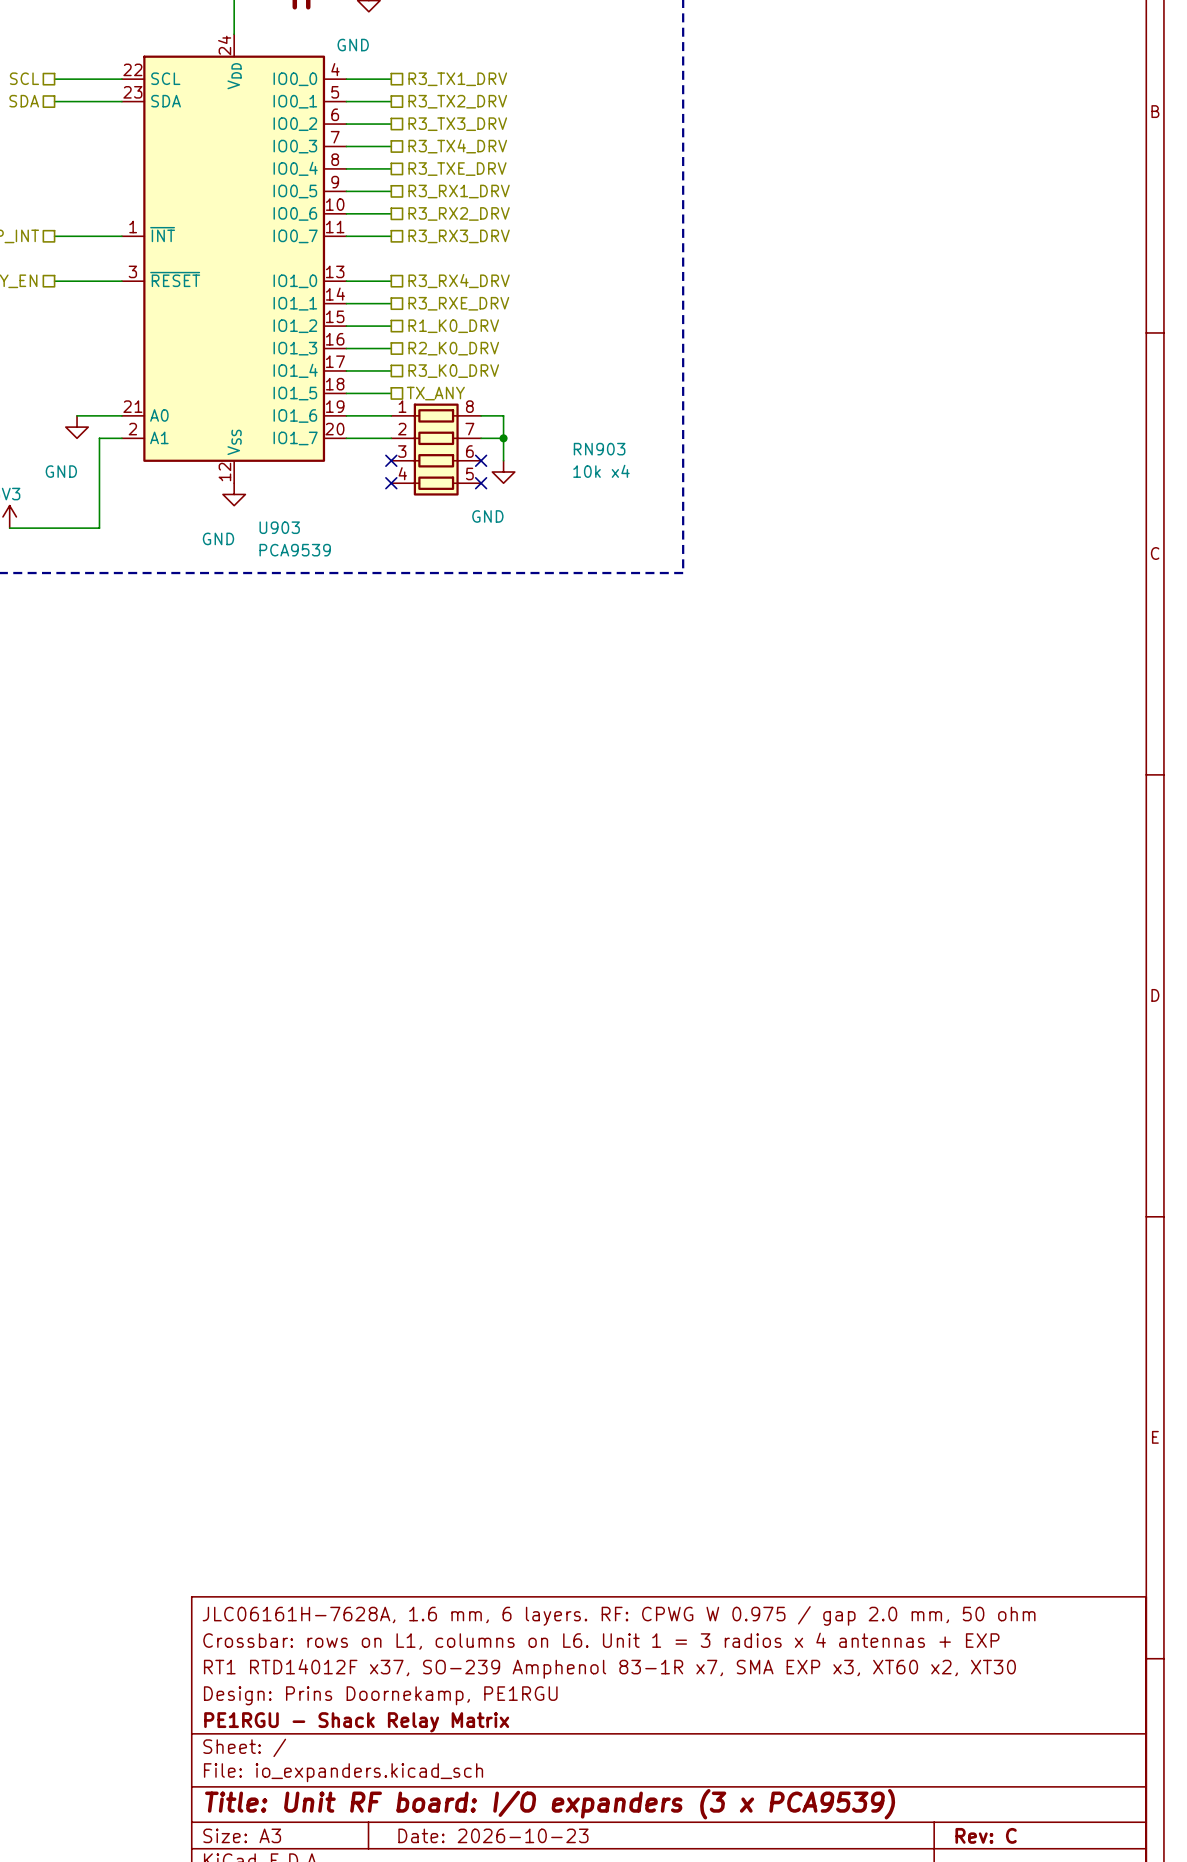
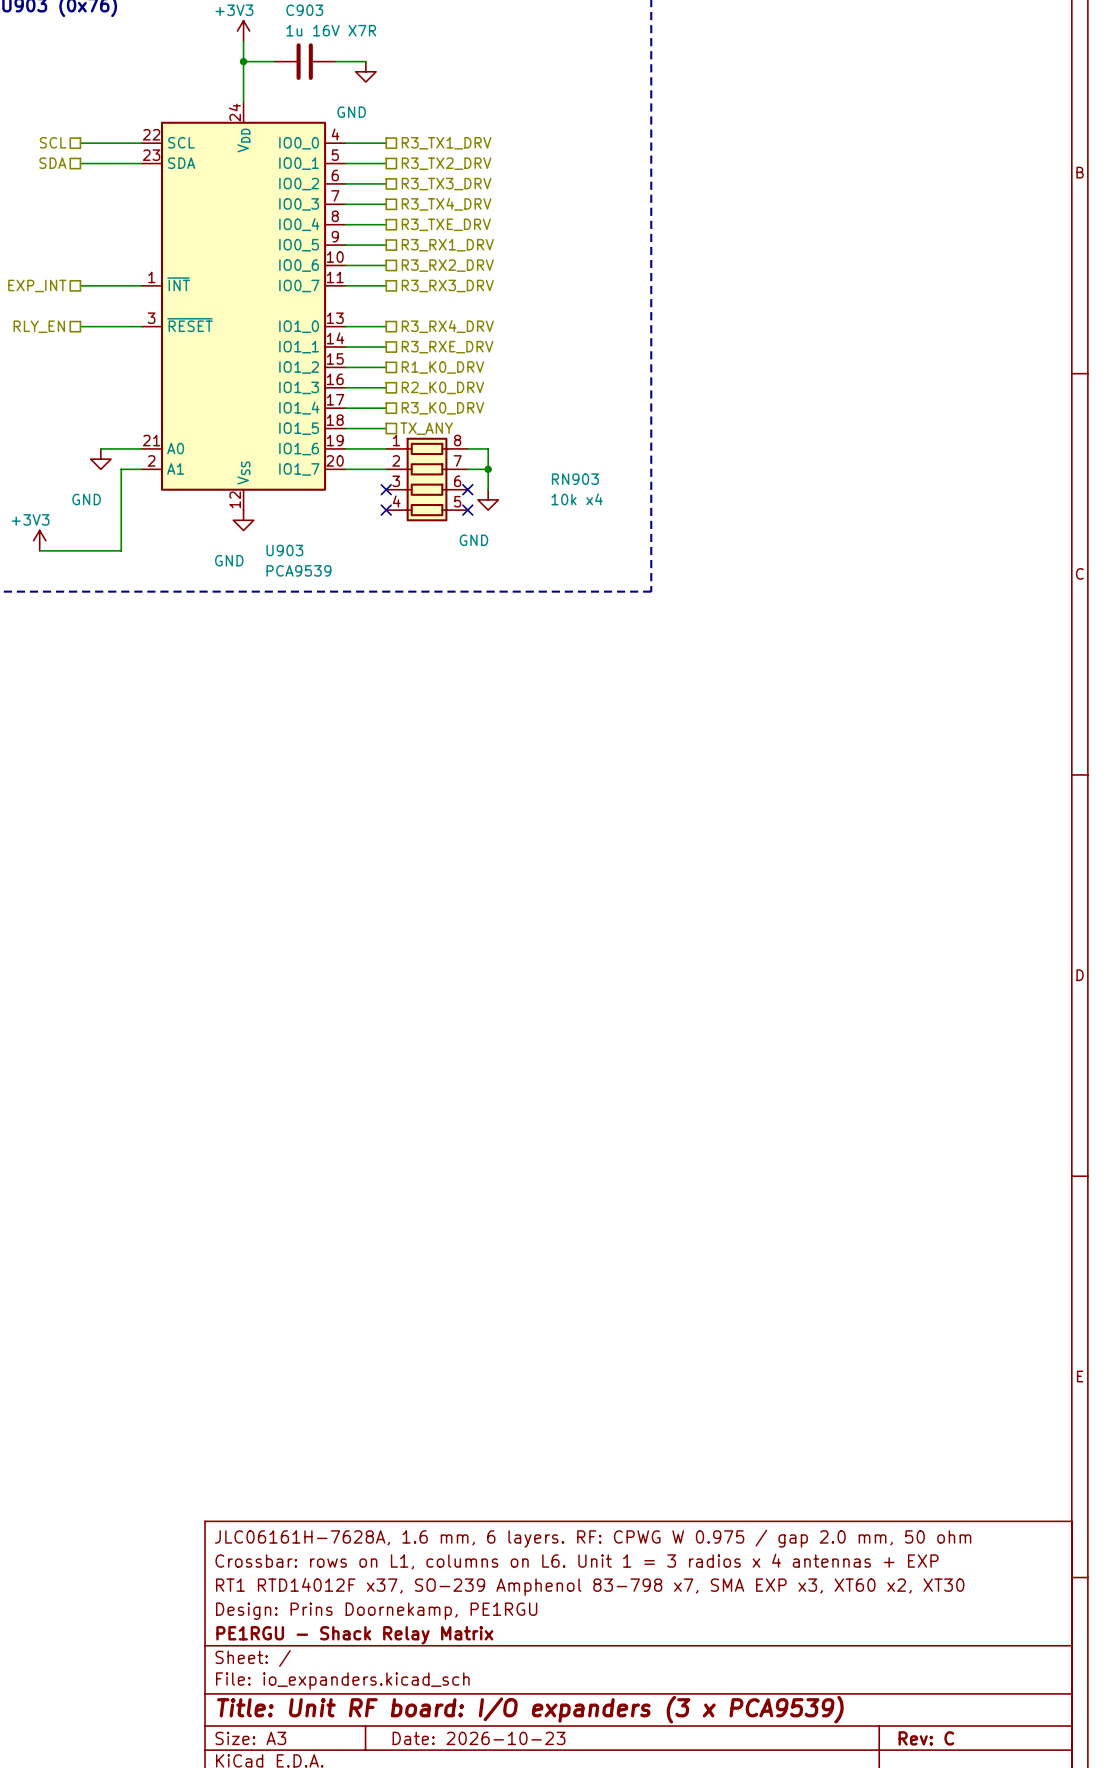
title block: RT1 RTD14012F x37, SO-239 Amphenol 83-1R x7, SMA EXP x3, XT60 x2, XT30 (609, 1668) -> RT1 RTD14012F x37, SO-239 Amphenol 83-798 x7, SMA EXP x3, XT60 x2, XT30 (590, 1586)

